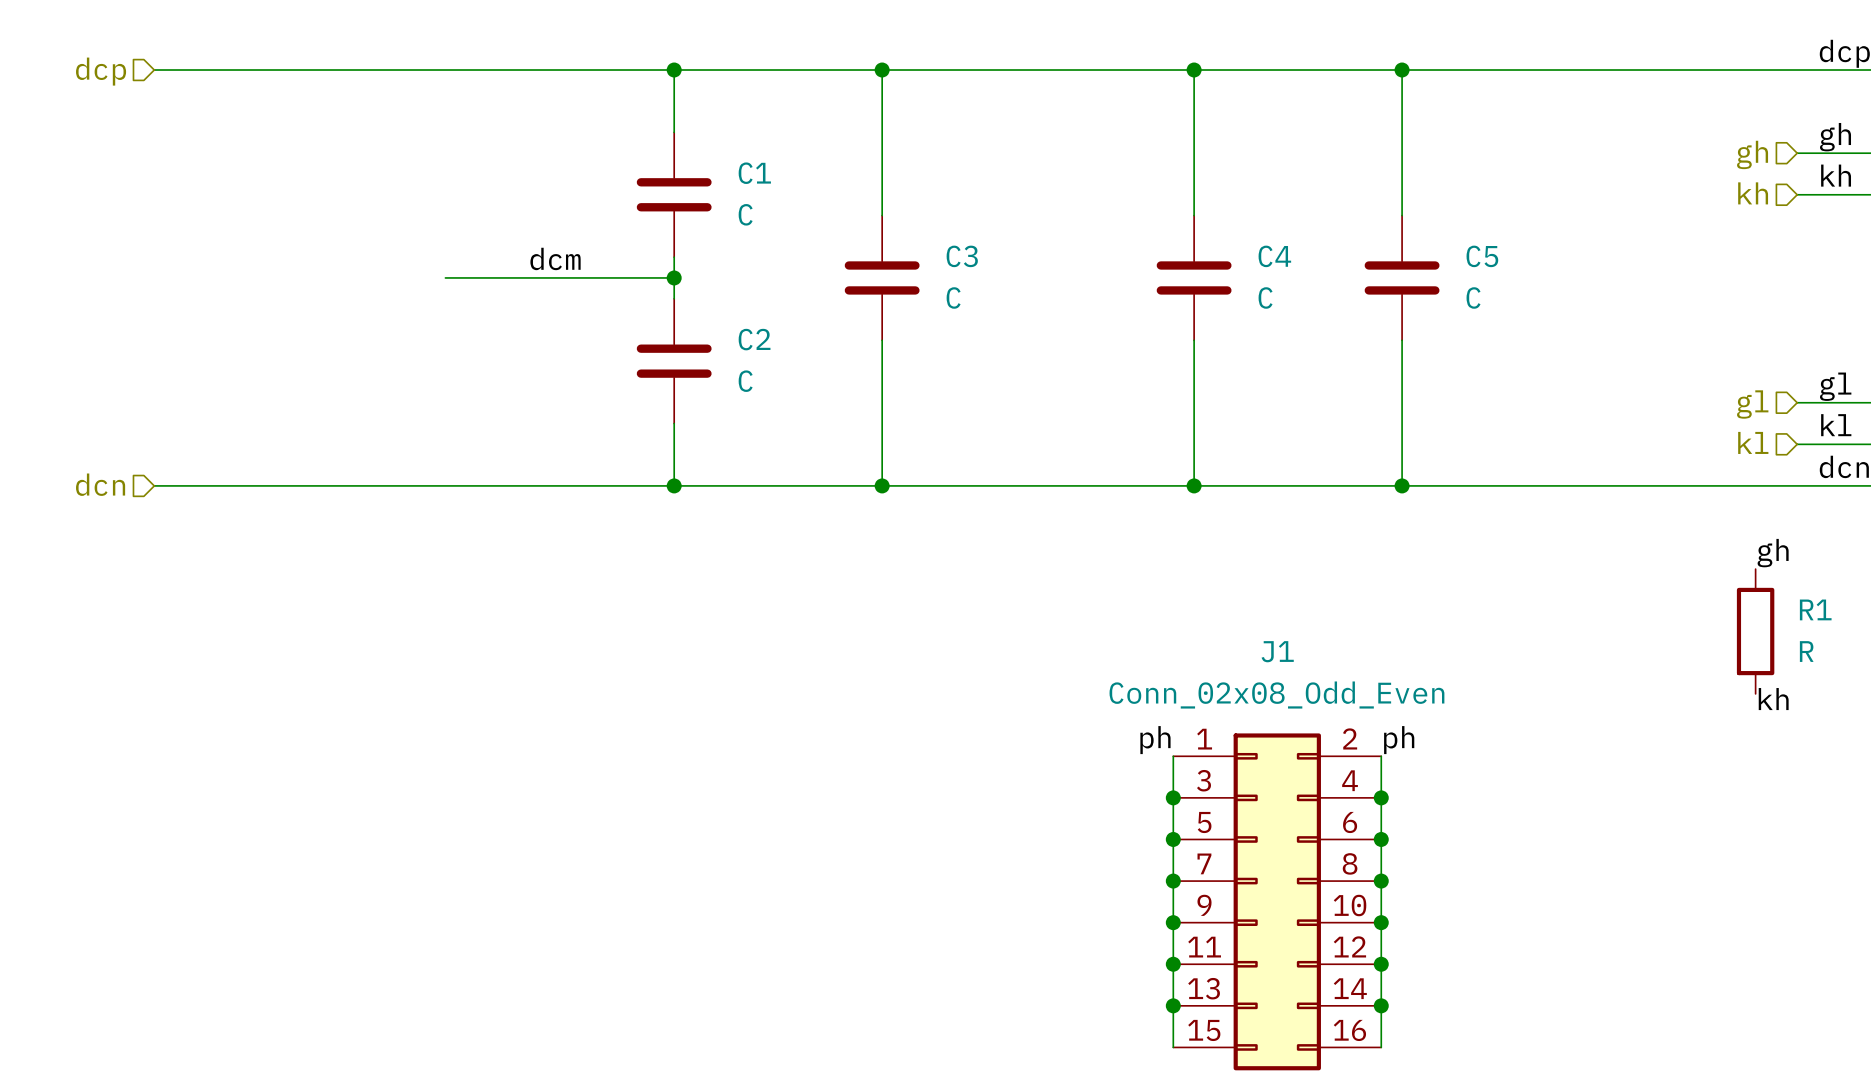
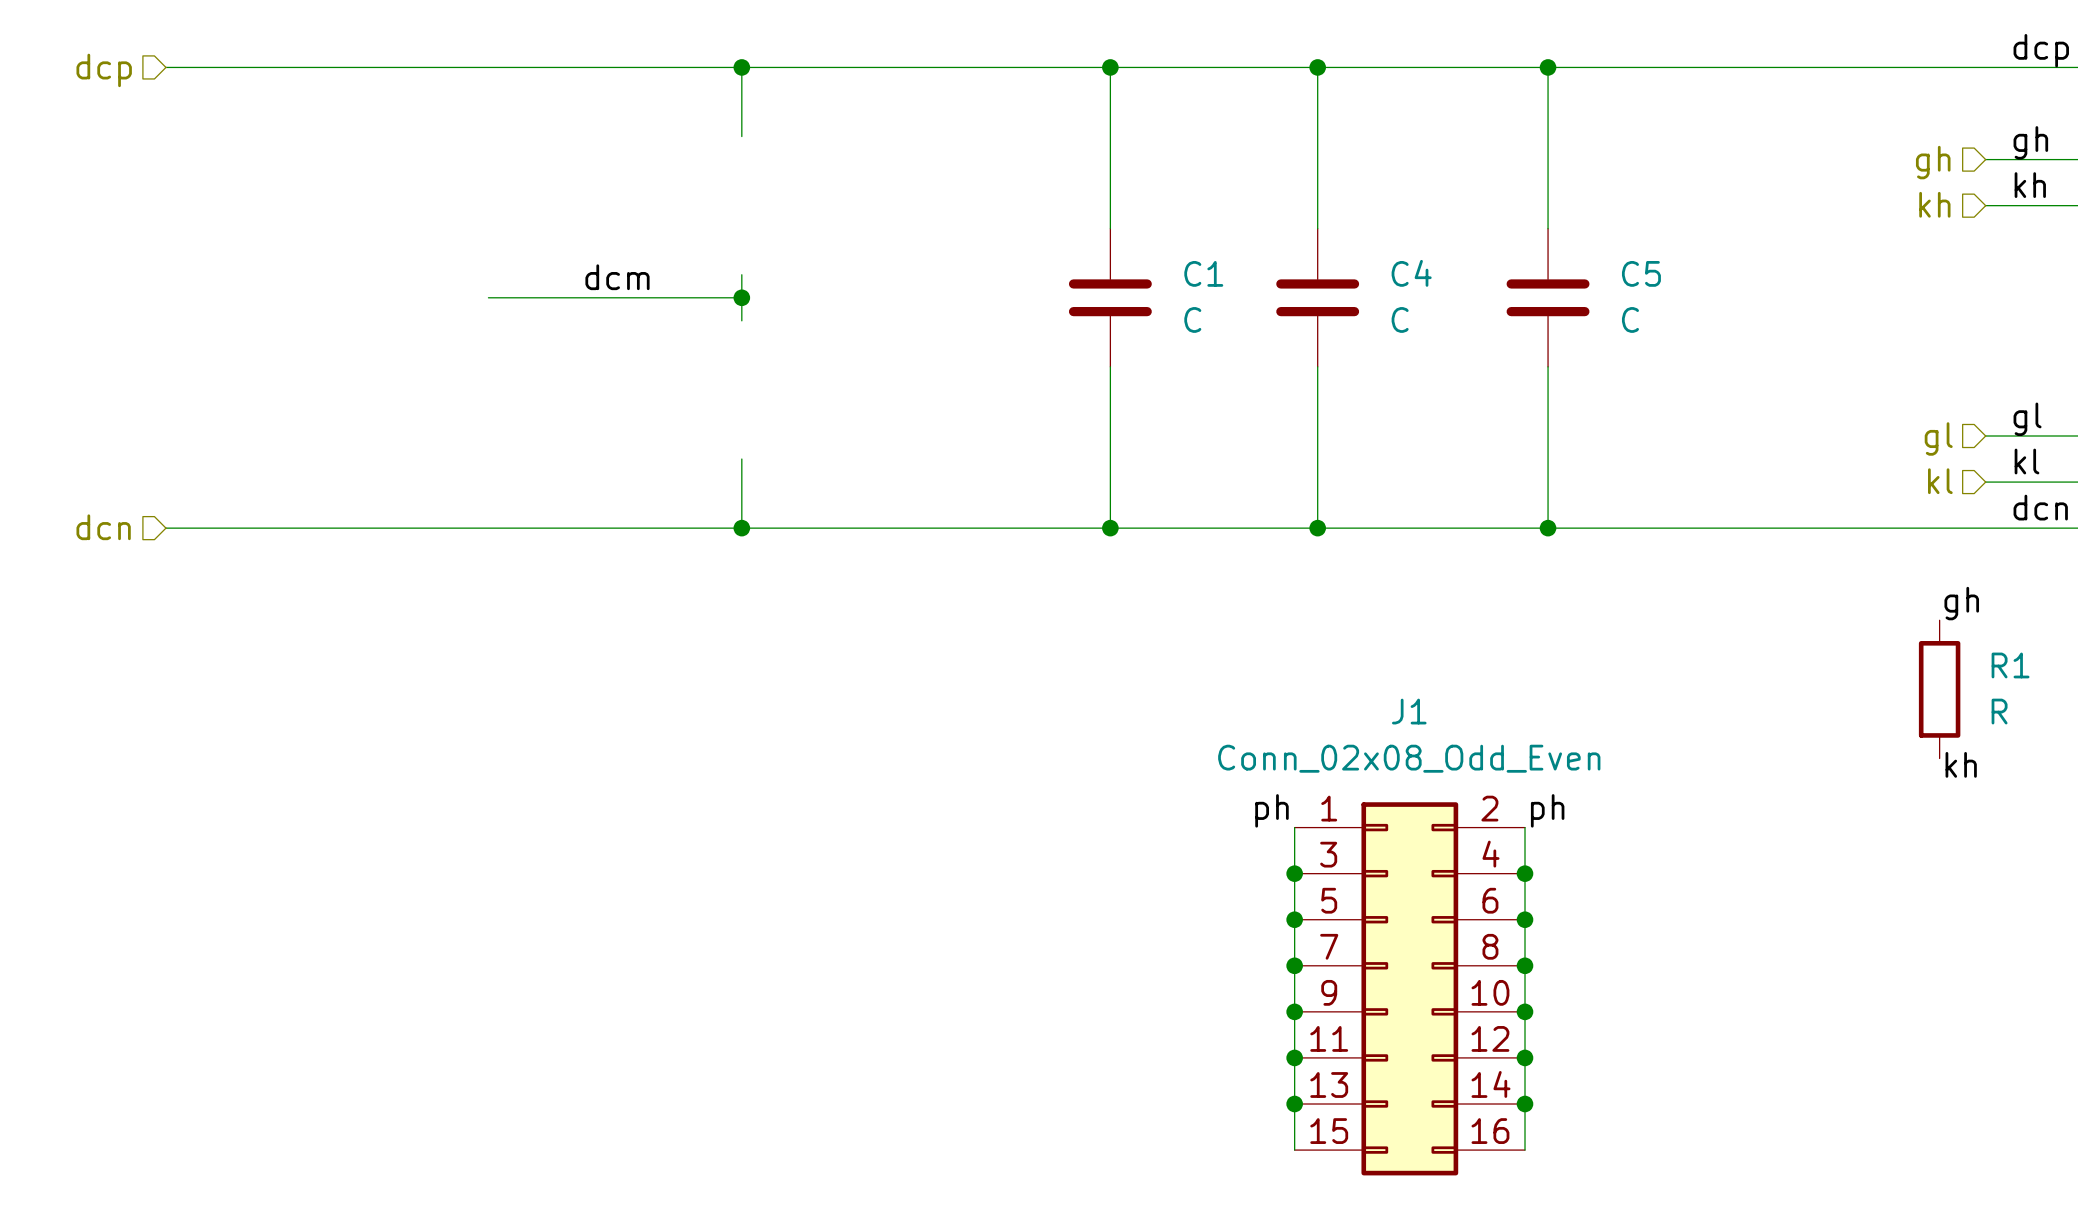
wire: (882, 70) (882, 215) -> (1110, 67) (1110, 228)
junction: (882, 70) -> none
junction: none -> (1110, 67)
C1 position: (674, 194) -> (1110, 297)
C3: C (882, 277) -> none
wire: (882, 340) (882, 485) -> (1110, 366) (1110, 528)
C2: C (674, 361) -> none
junction: (882, 485) -> none
junction: none -> (1110, 528)

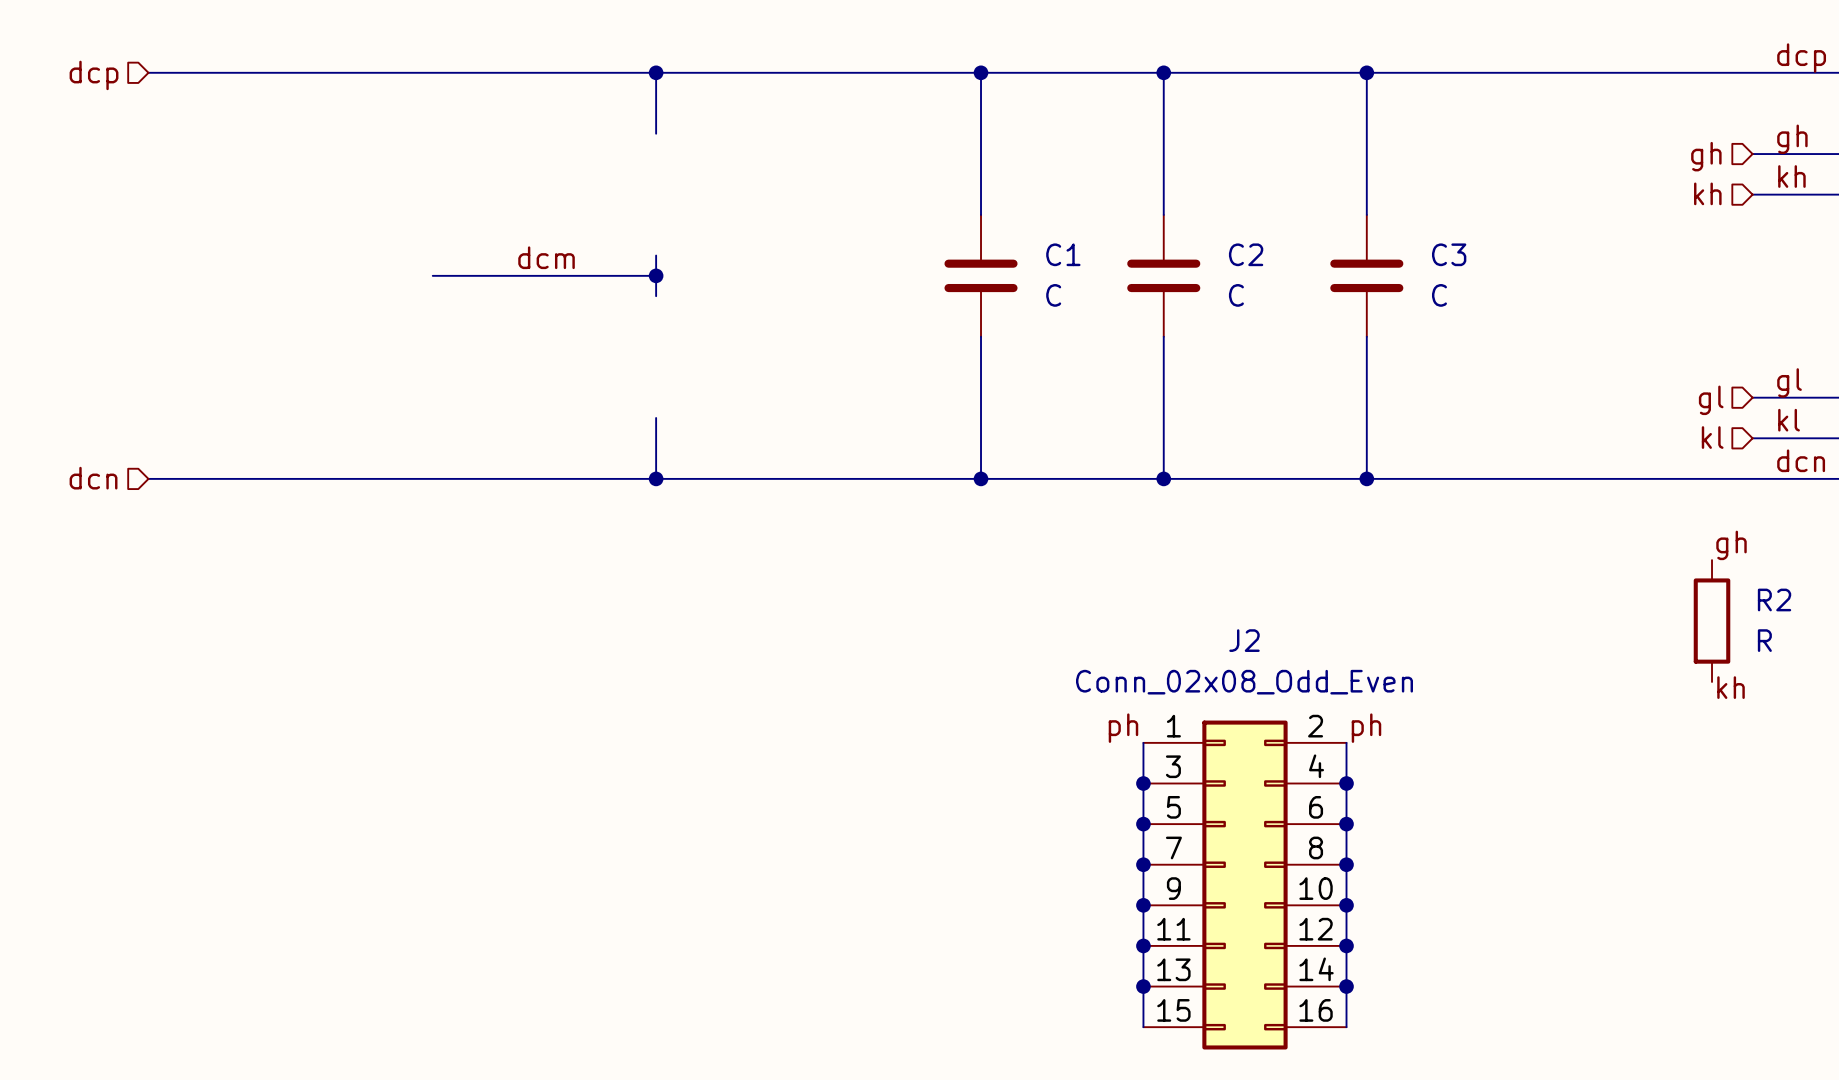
C4 name: C4 (1411, 273) -> C2 (1246, 254)
C5 name: C5 (1641, 273) -> C3 (1449, 254)
R1 name: R1 (2010, 665) -> R2 (1774, 599)
J1 name: J1 (1409, 711) -> J2 (1244, 640)

